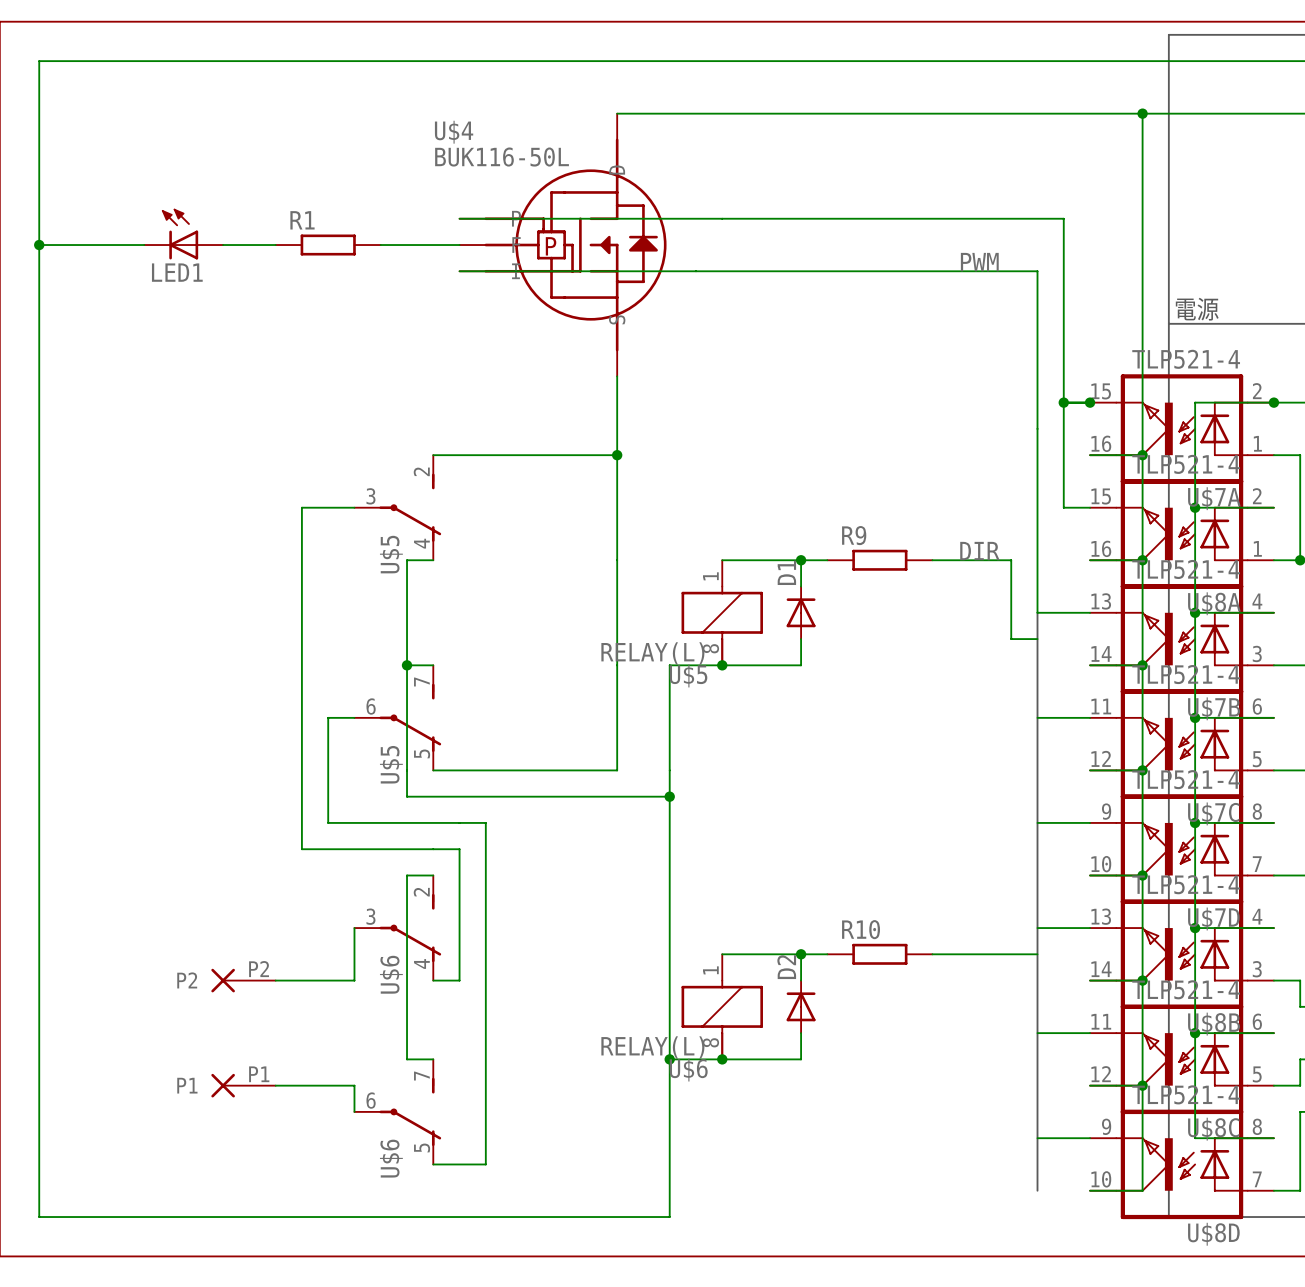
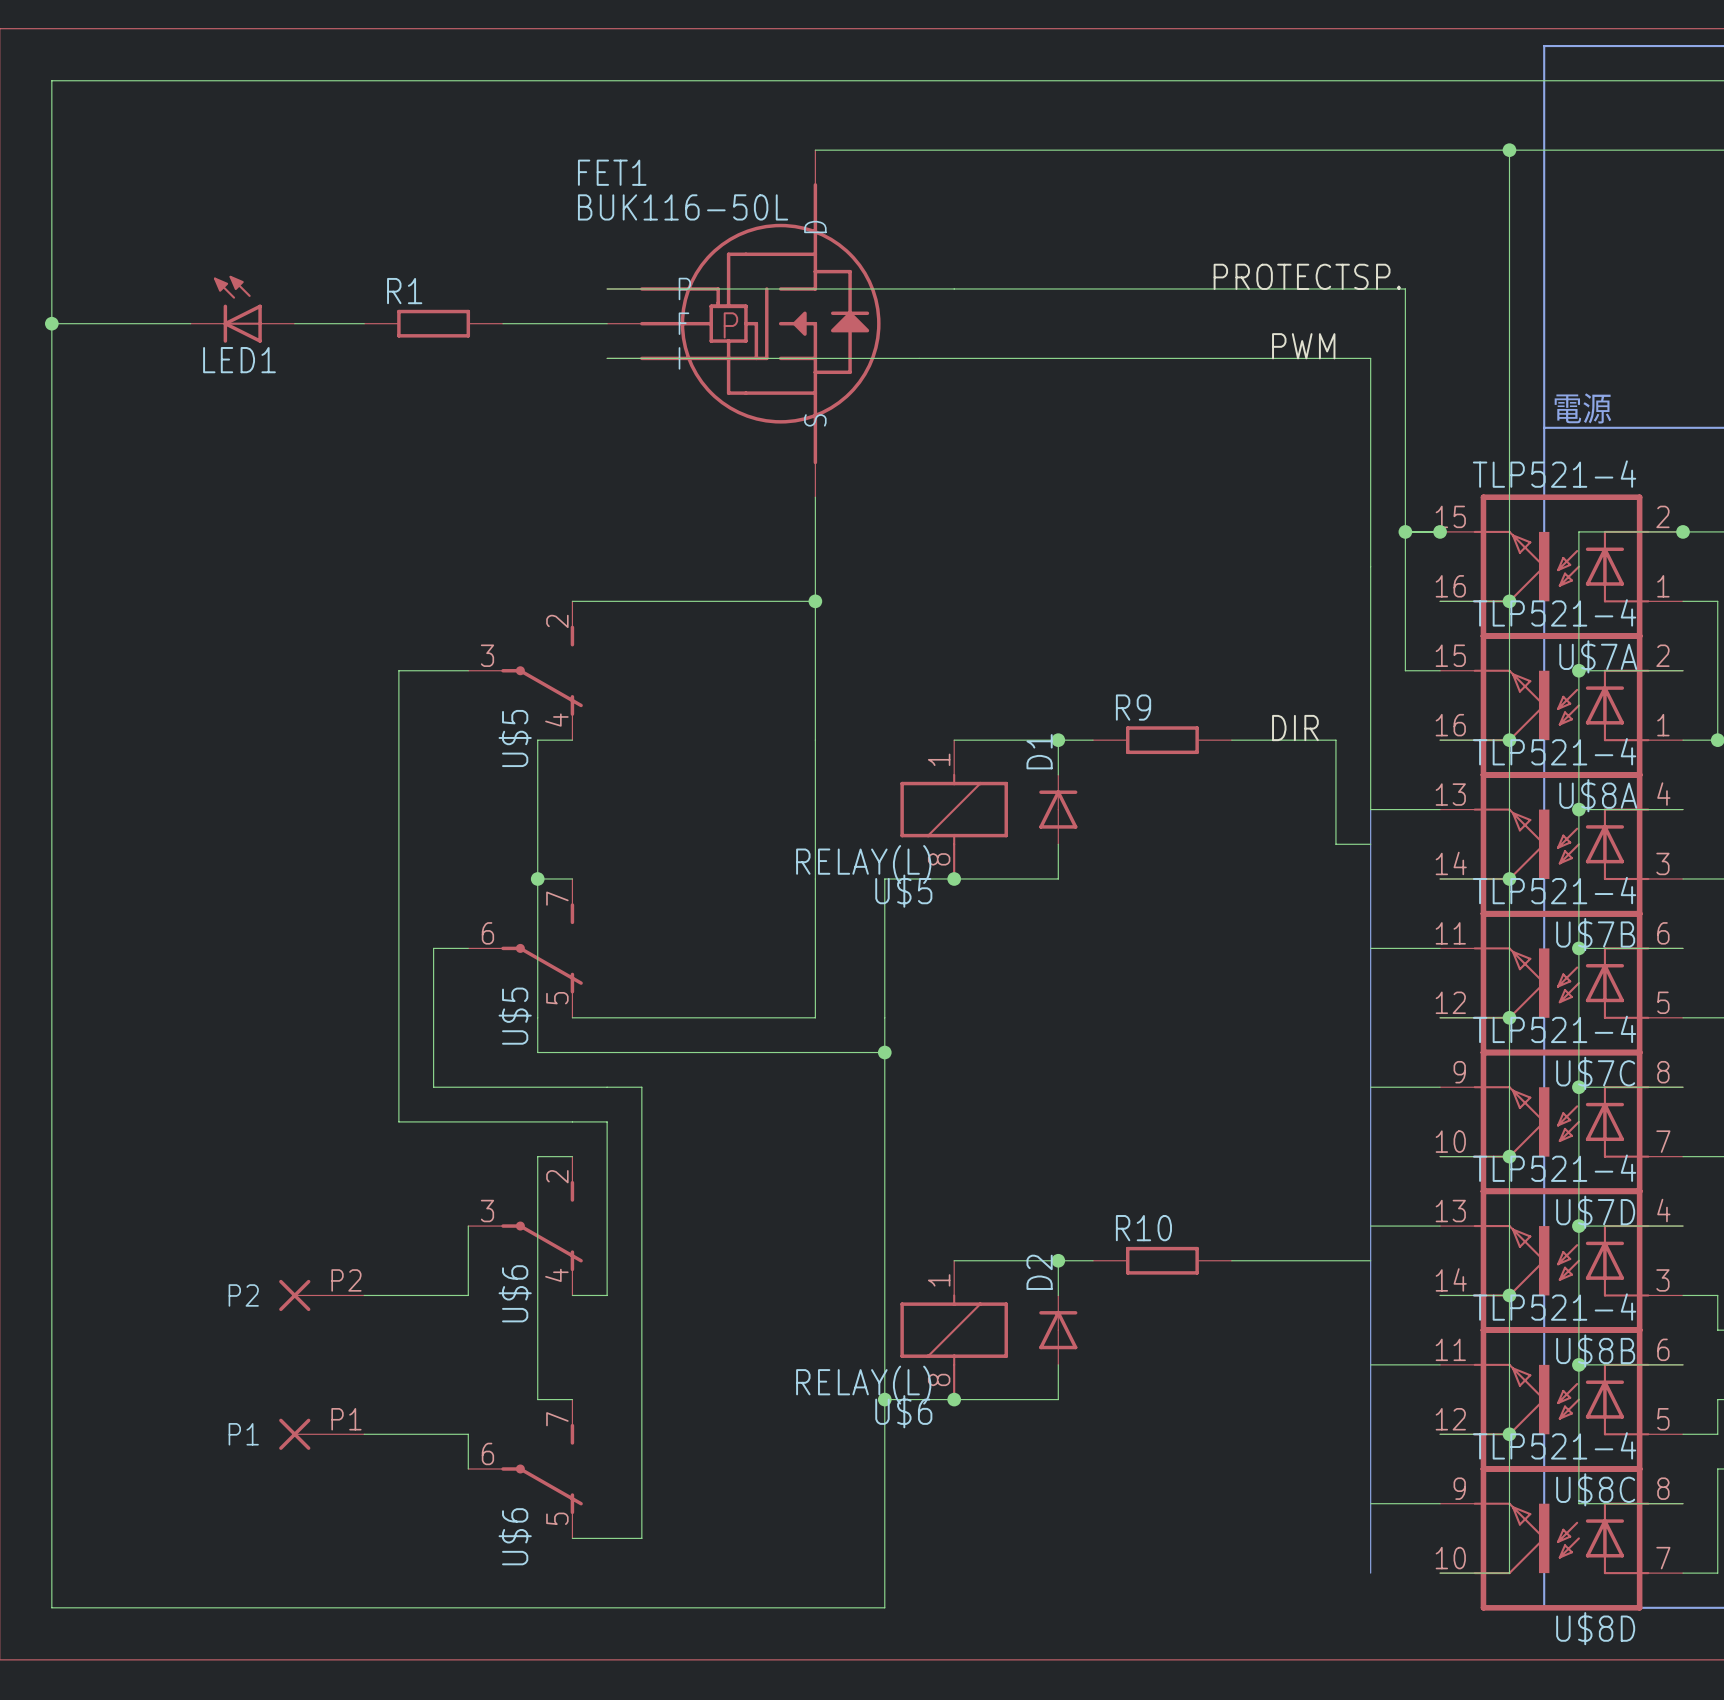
U$4 name: U$4 (454, 132) -> FET1 (612, 172)
label: none -> PROTECTSP. (1307, 276)

